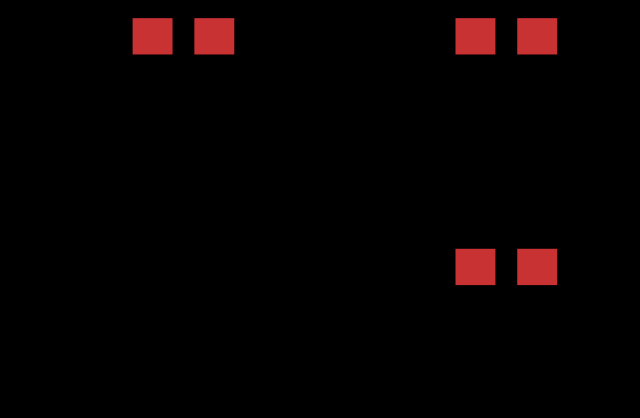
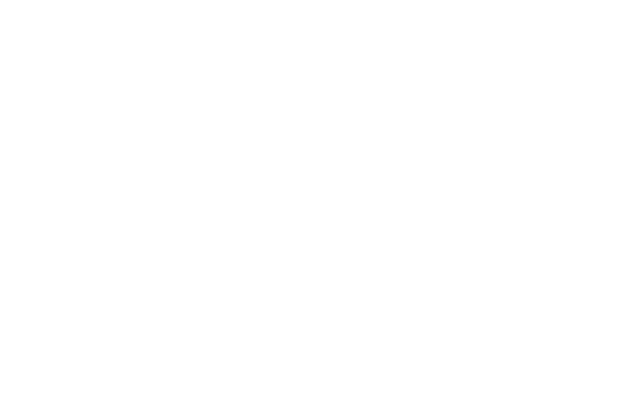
part: (183, 36) -> none
part: (506, 36) -> none
part: (506, 266) -> none

